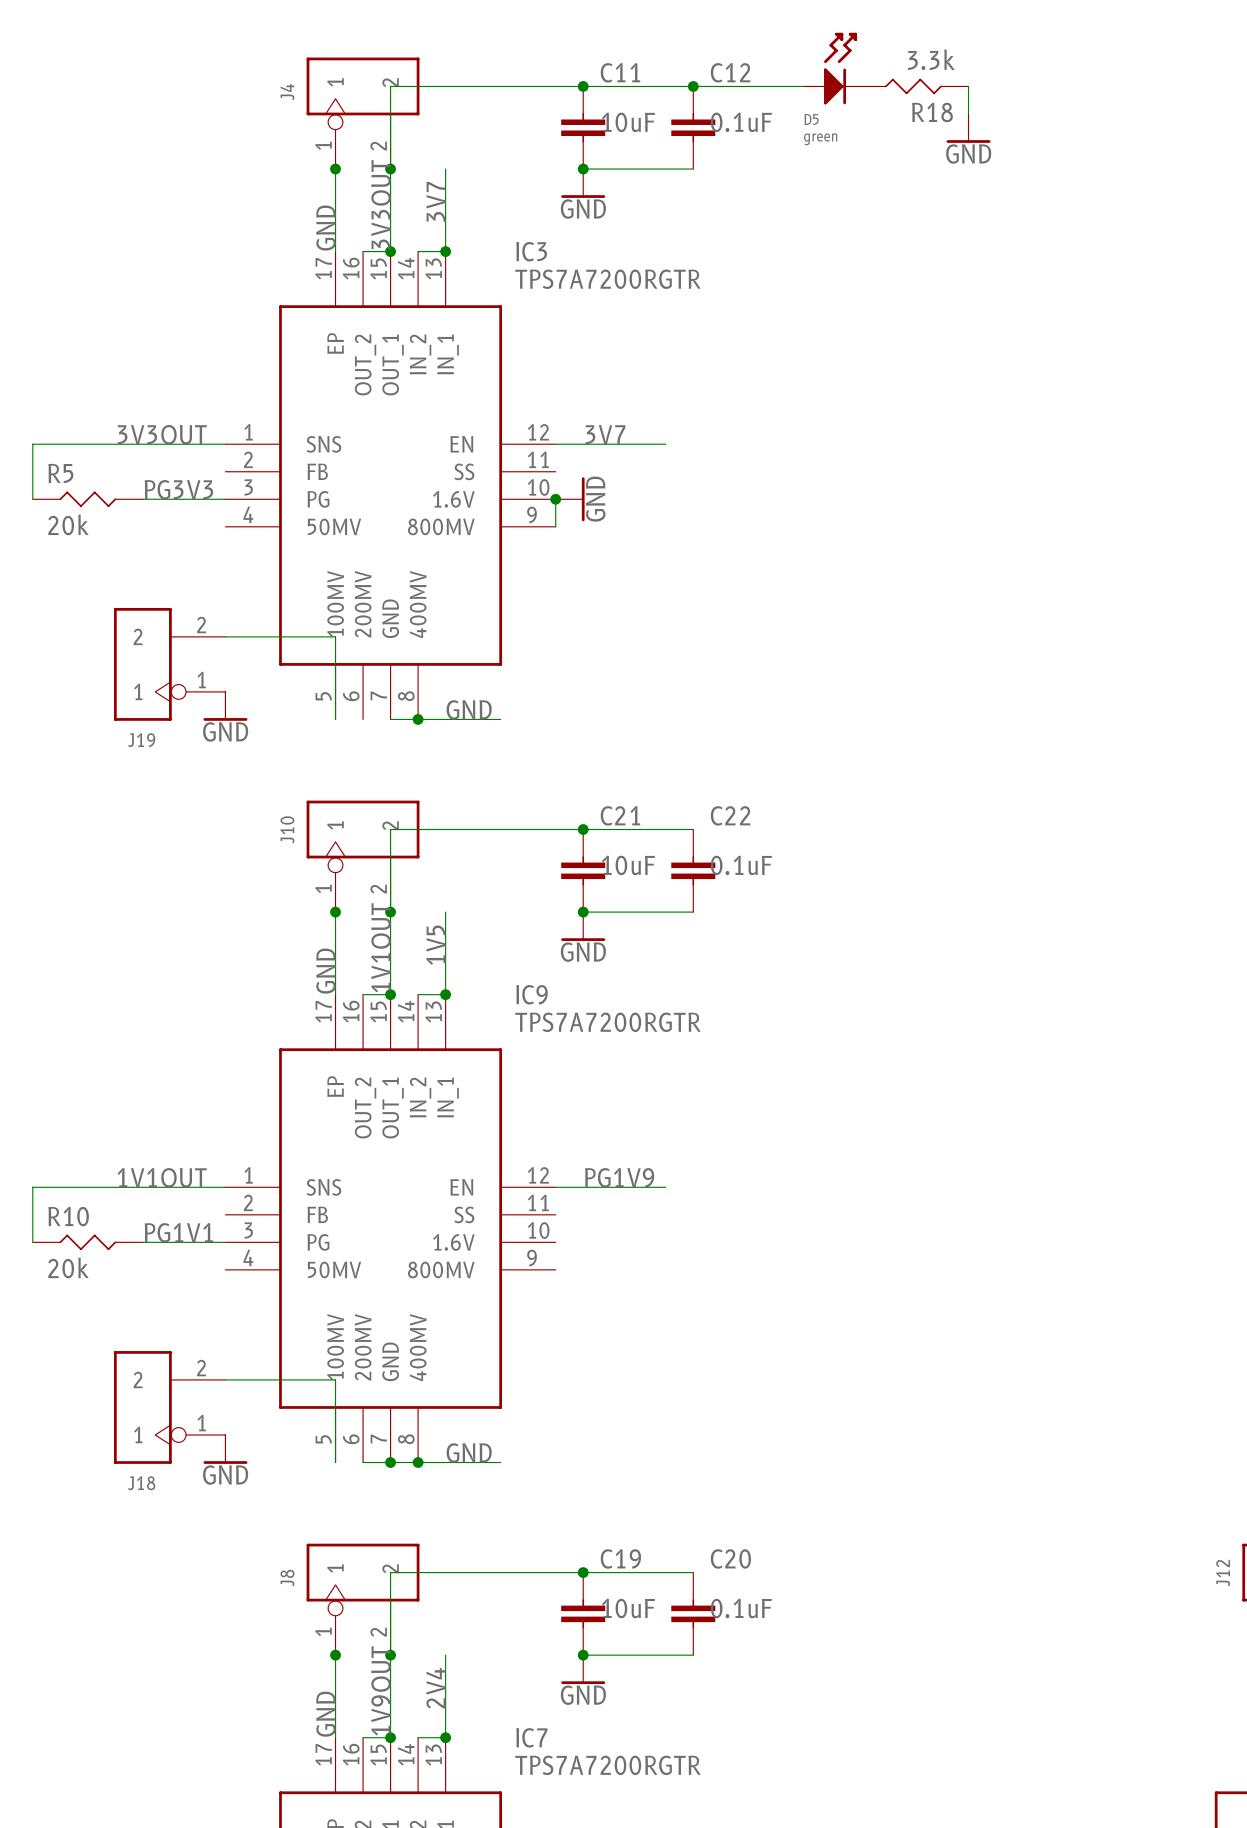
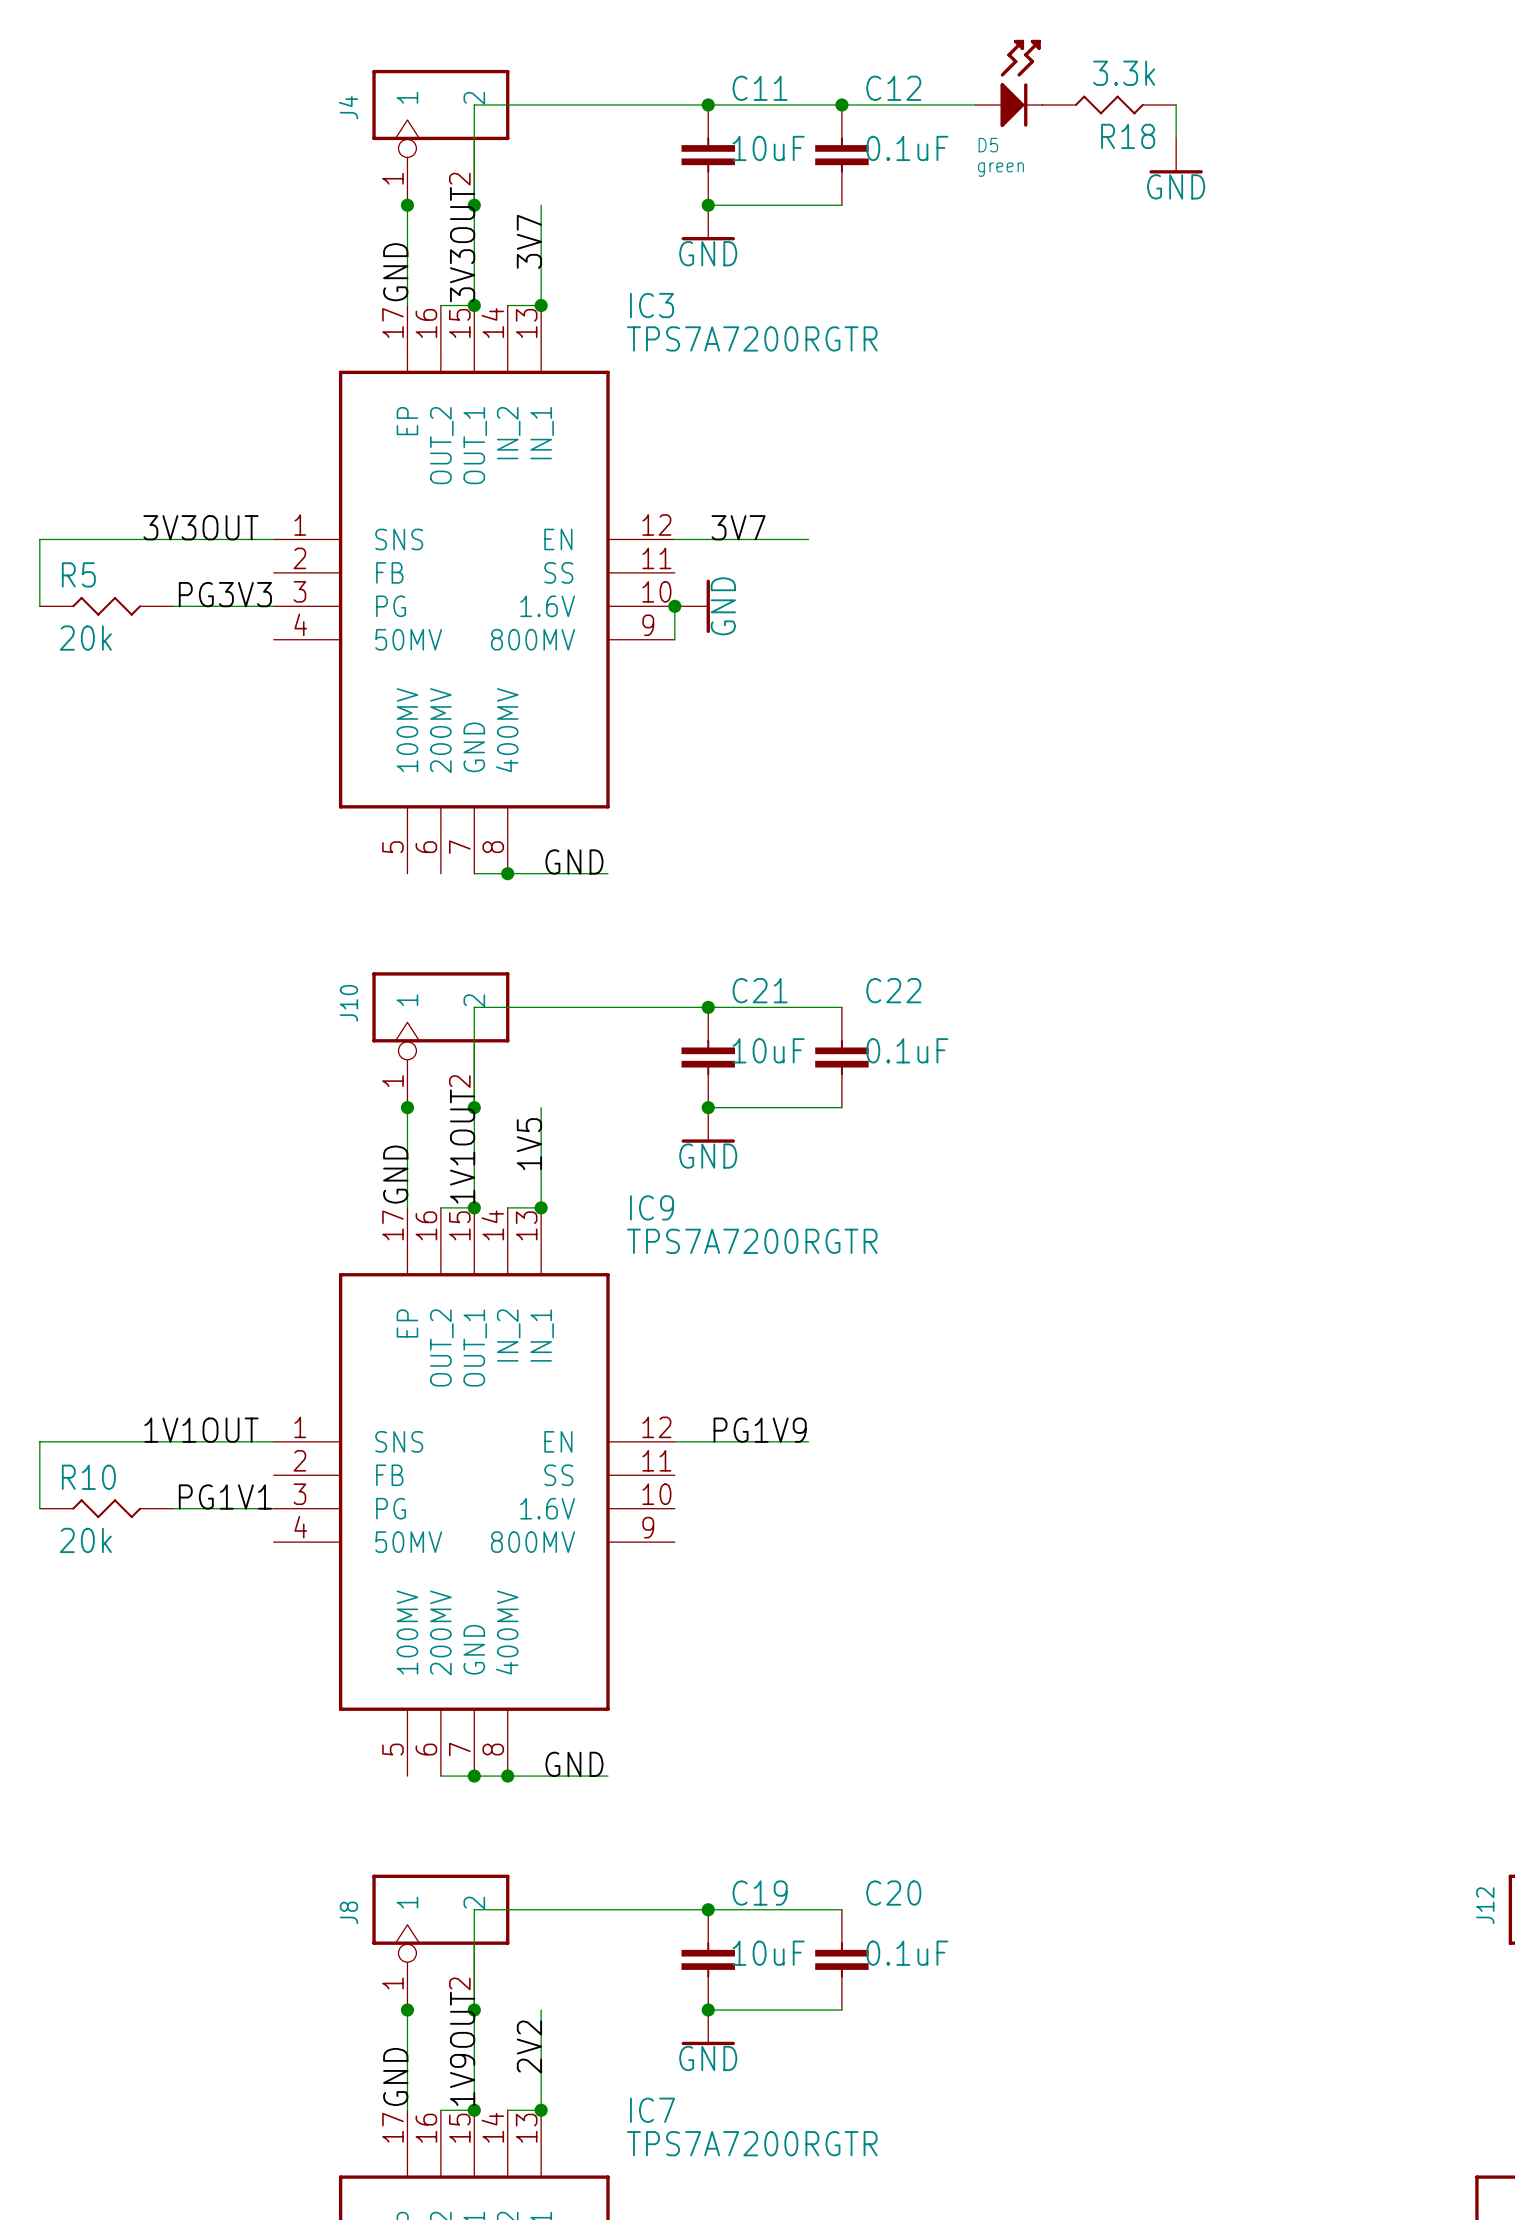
wire: (225, 636) (335, 636) (335, 719) -> none
J19: (169, 664) -> none
power symbol: GND (225, 706) -> none
wire: (225, 1379) (335, 1379) (335, 1462) -> none
J18: (169, 1407) -> none
power symbol: GND (225, 1449) -> none
label: 2V4 (436, 1688) -> 2V2 (529, 2047)

